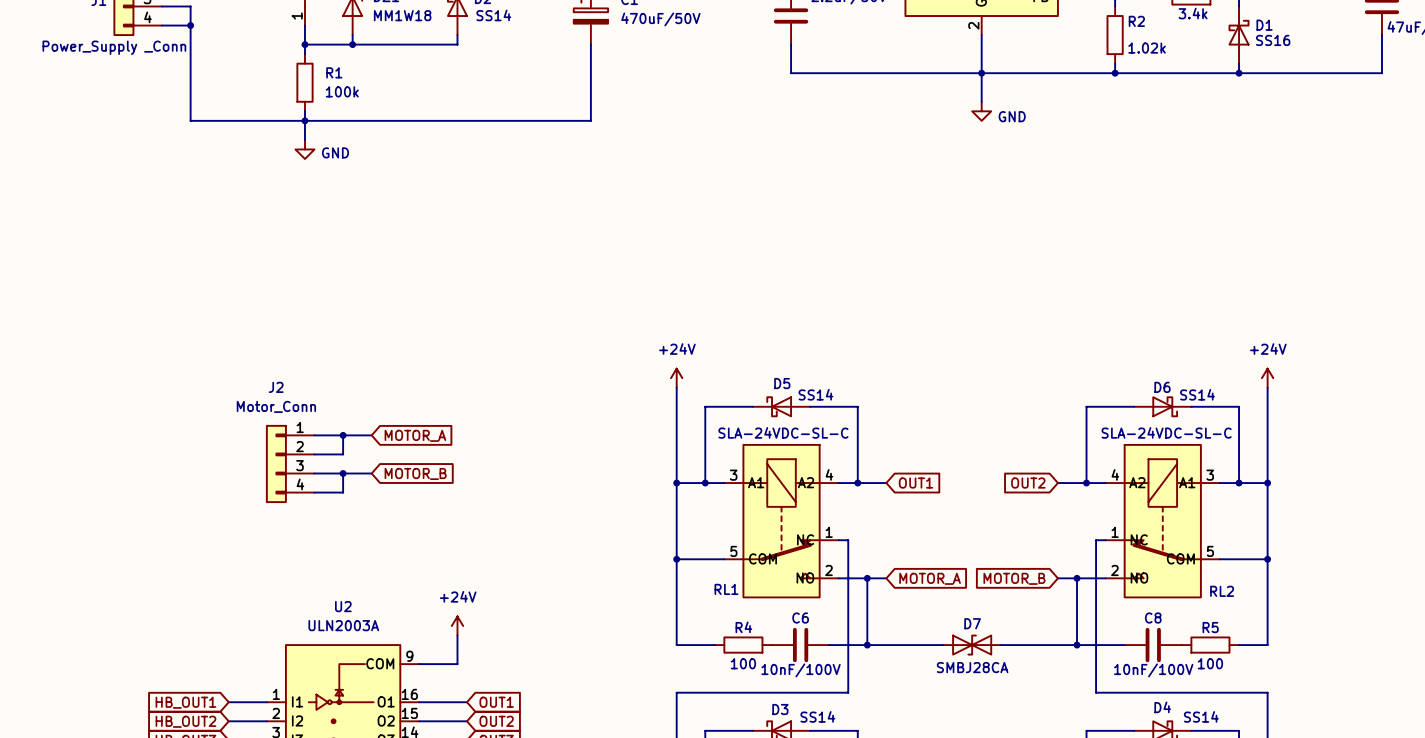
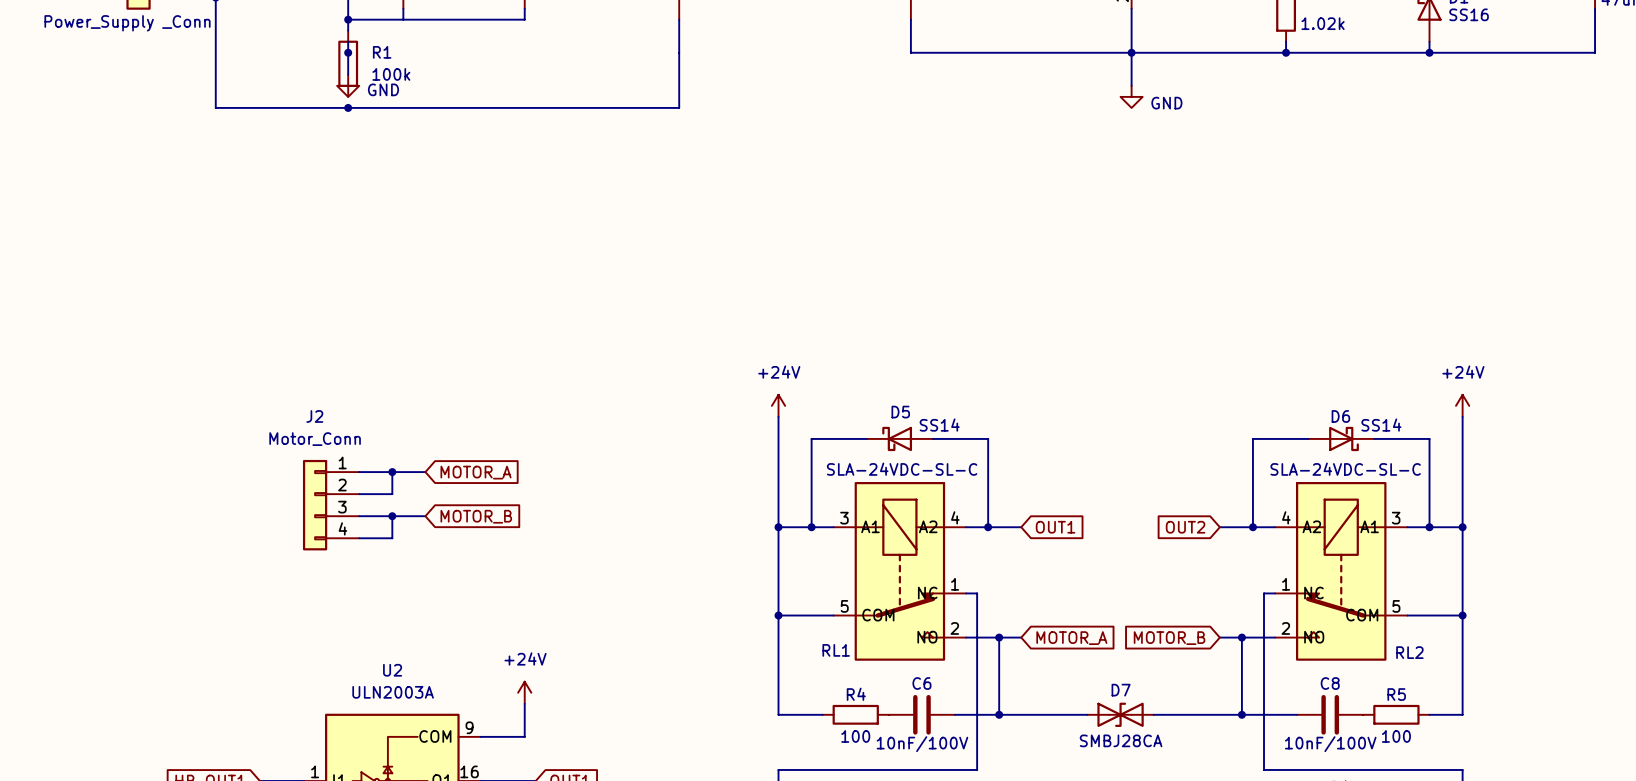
junction: (352, 44) -> none
junction: none -> (348, 52)
wire: (304, 111) (304, 139) -> (348, 41) (348, 74)
power symbol position: GND (304, 149) -> GND (348, 85)

